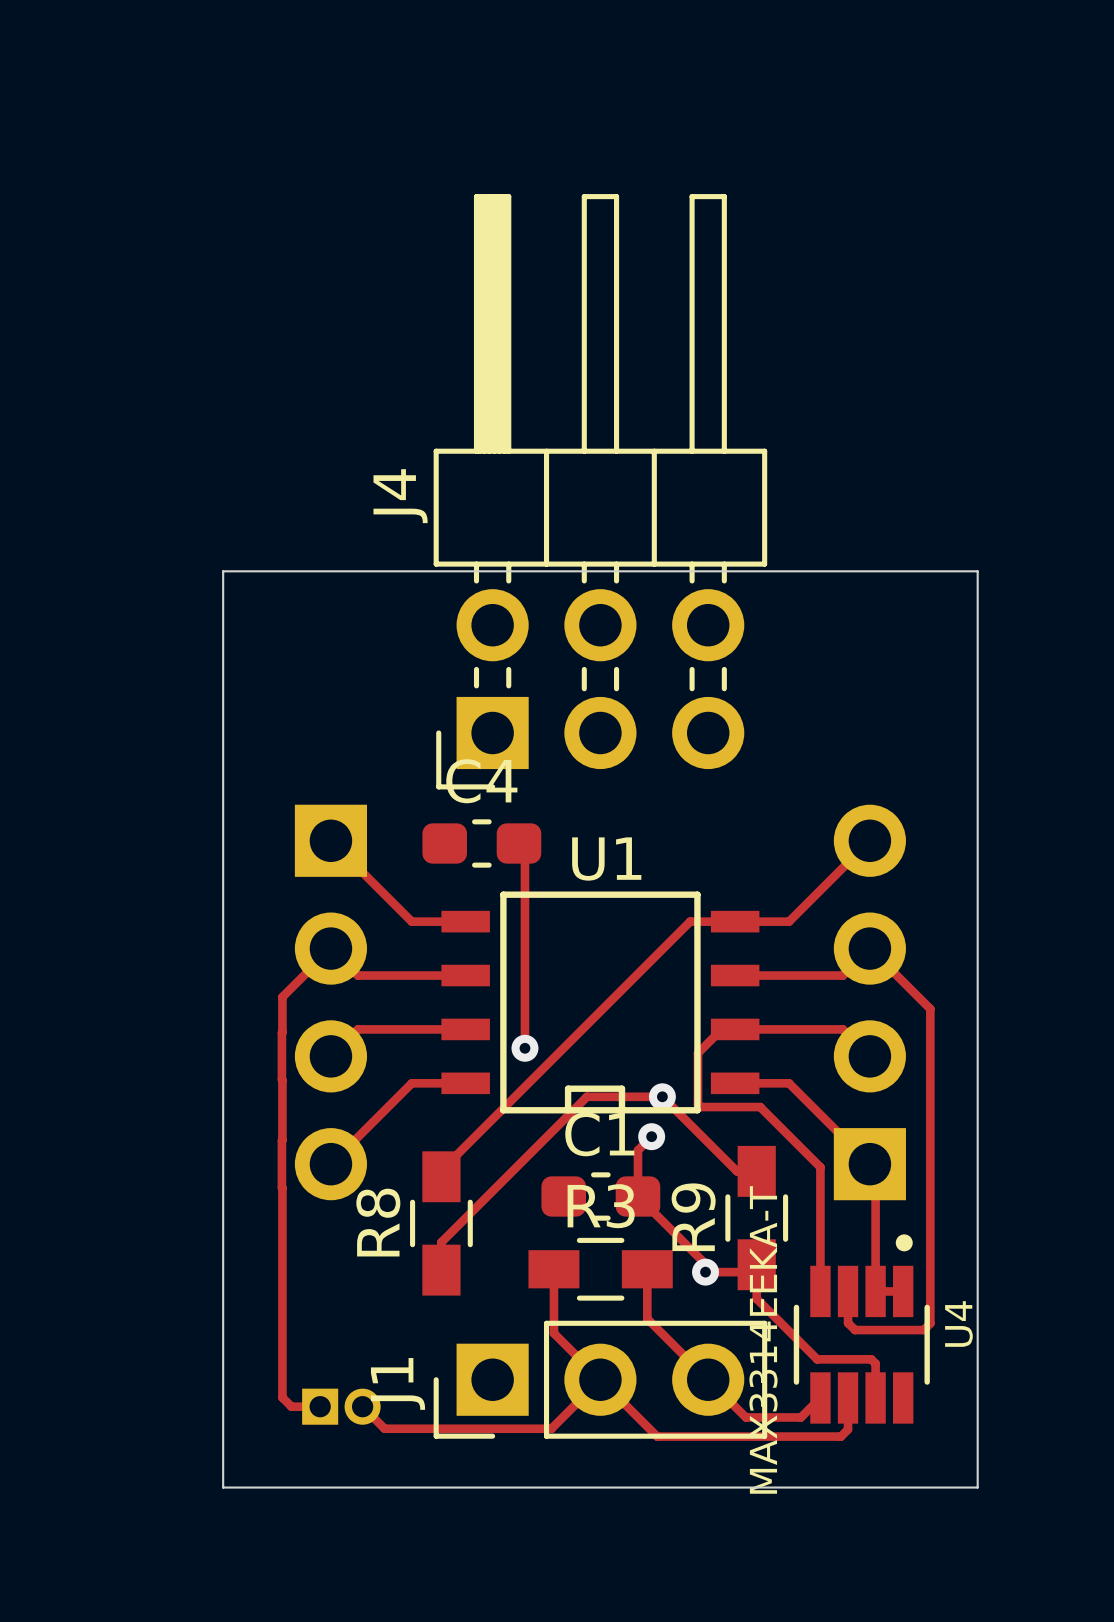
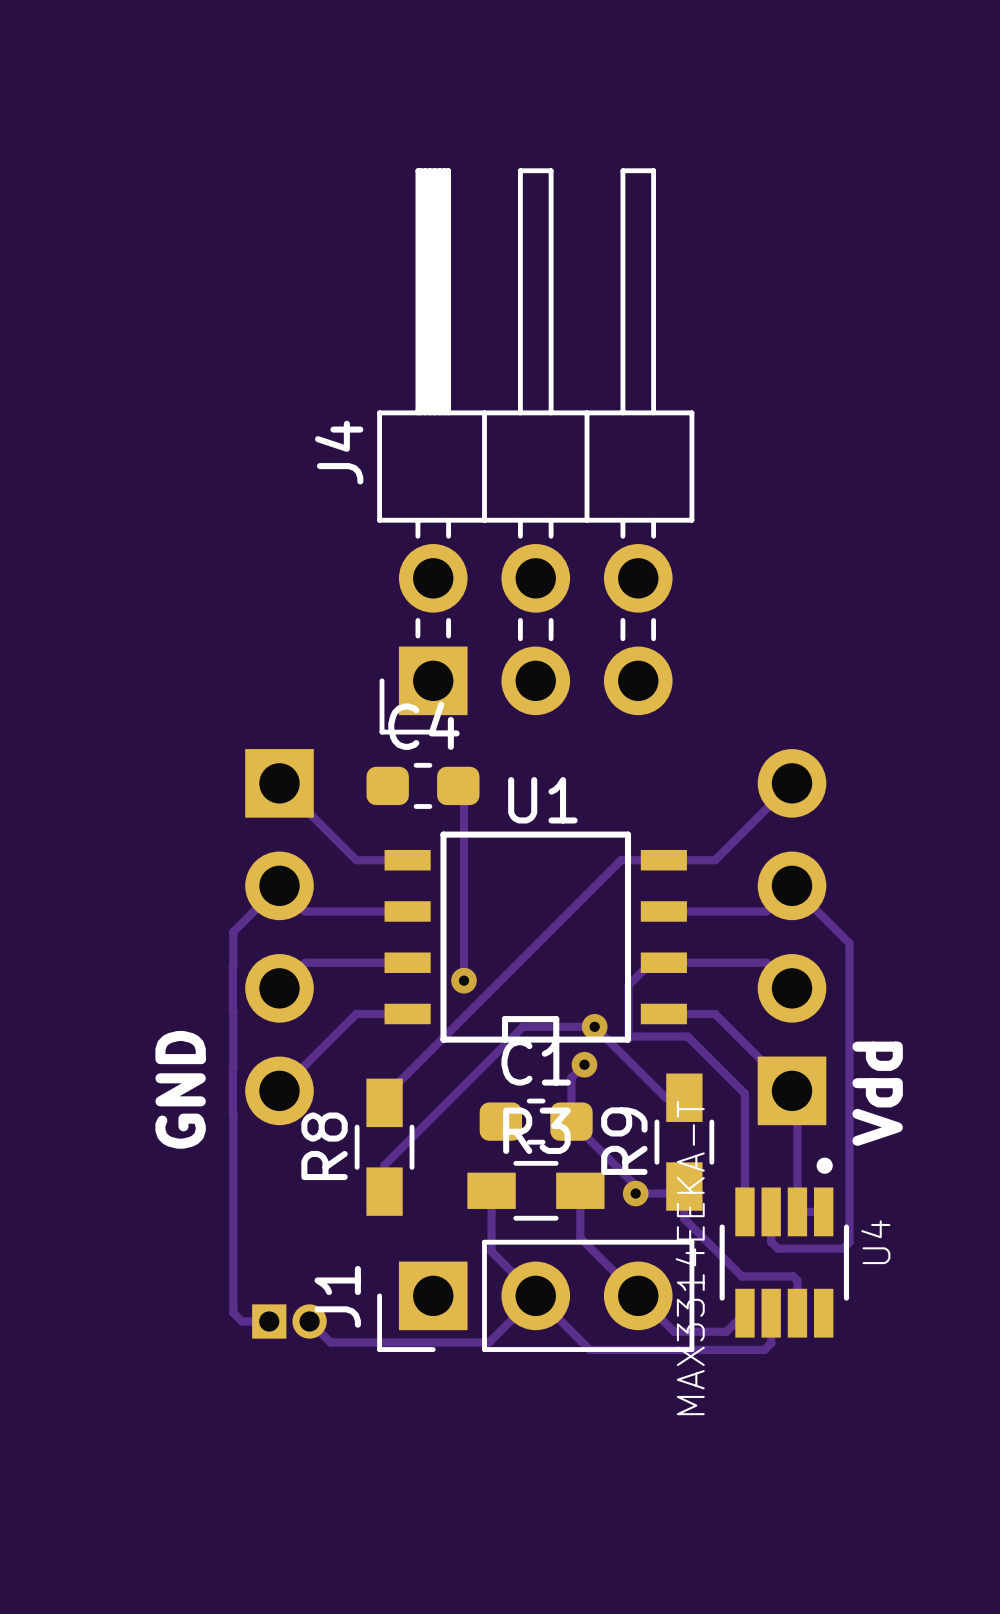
board edge: (223, 571) (223, 1487) (977, 1487) (977, 571) (223, 571) -> none
text: none -> GND (180, 1089)
text: none -> Vdd (877, 1093)

